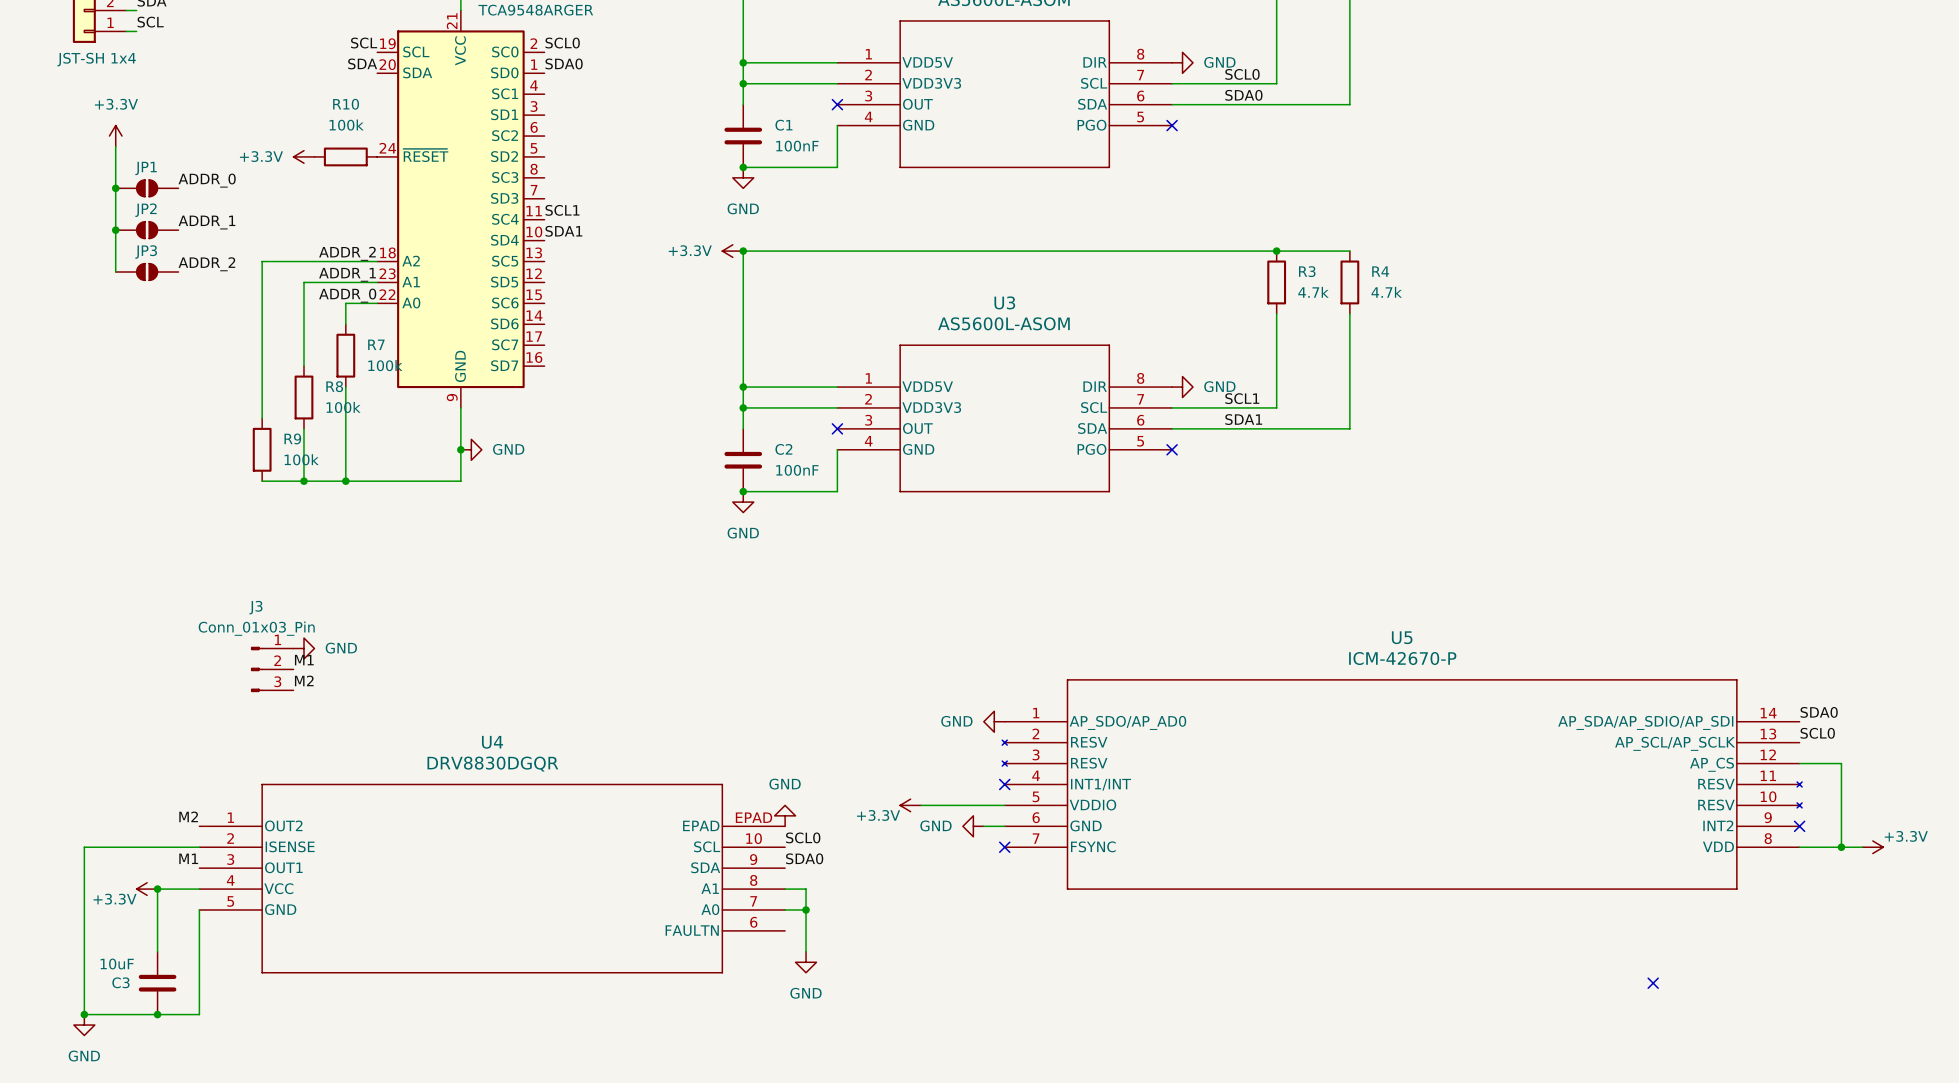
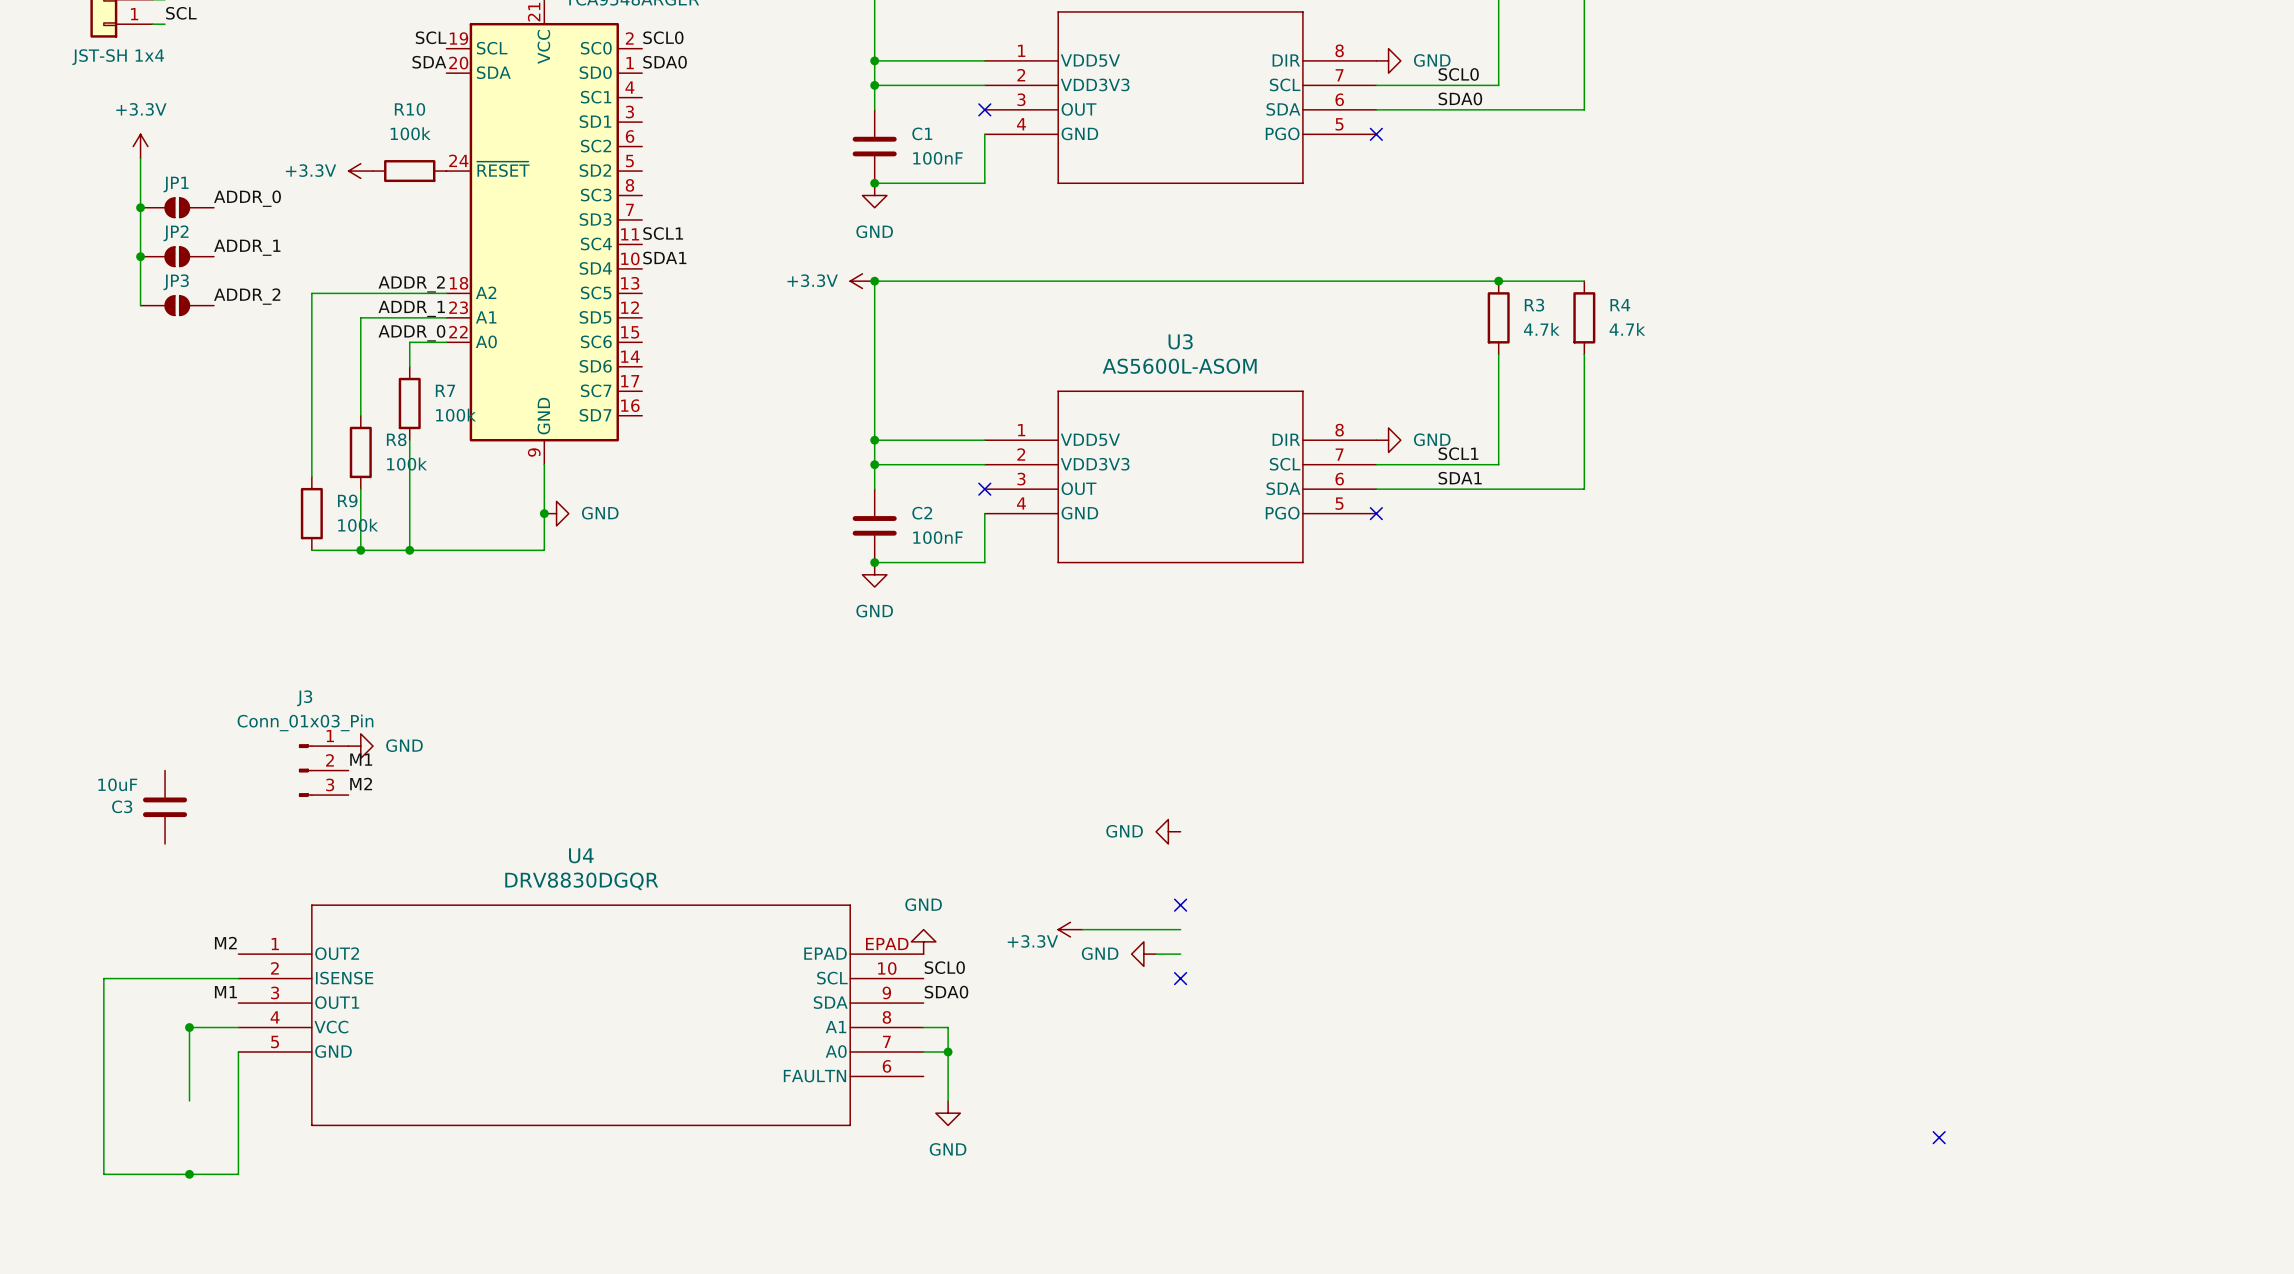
label: SDA0 (1819, 712) -> none
label: SCL0 (1817, 733) -> none
wire: (1799, 763) (1841, 763) (1841, 847) -> none
U5: ICM-42670-P (1402, 784) -> none
no-connect mark: (1799, 826) -> none
wire: (1799, 847) (1862, 847) -> none
junction: (1841, 847) -> none
power symbol: +3.3V (1872, 847) -> none
power symbol: +3.3V (147, 889) -> none
C3 position: (157, 983) -> (165, 807)
junction: (84, 1014) -> none
power symbol: GND (84, 1025) -> none

